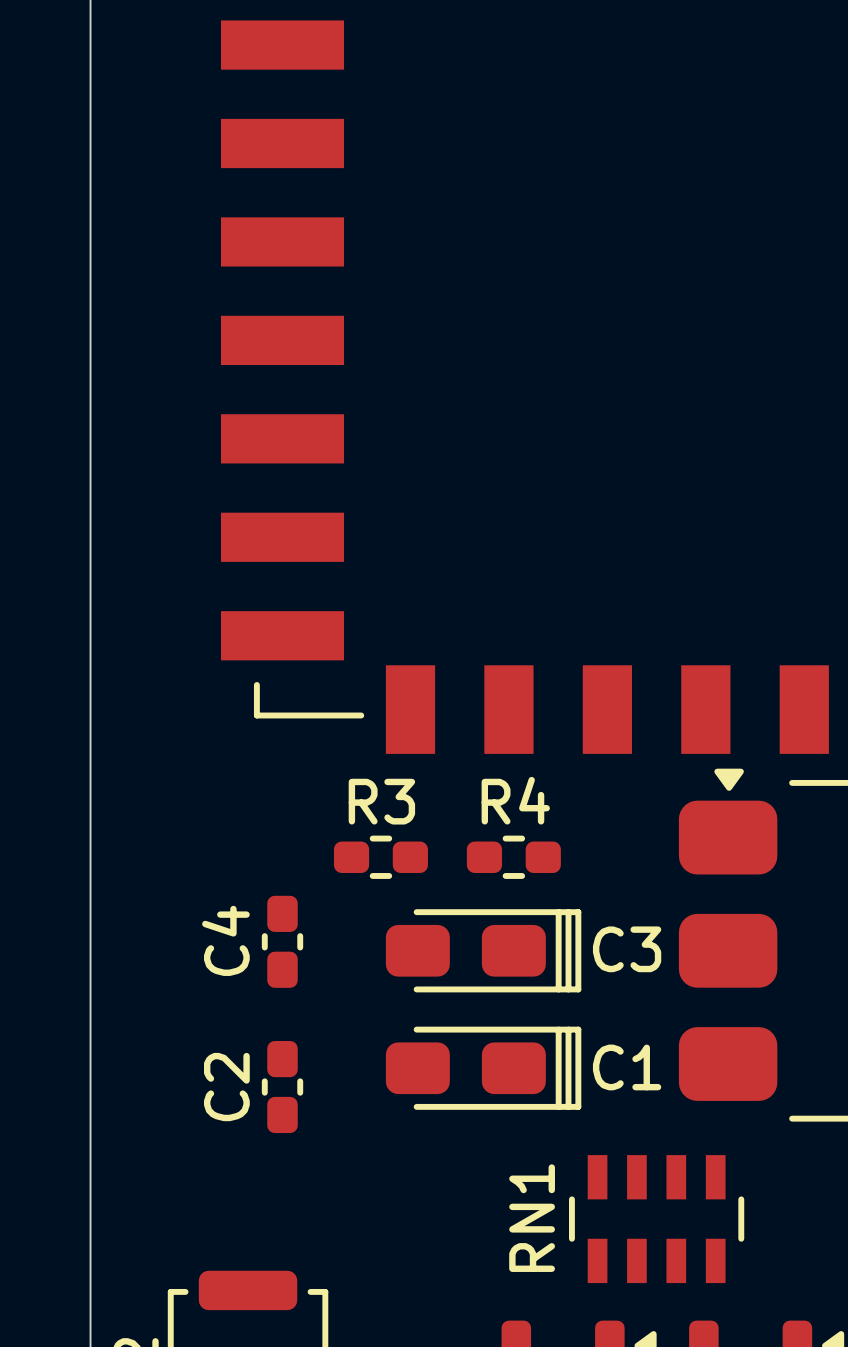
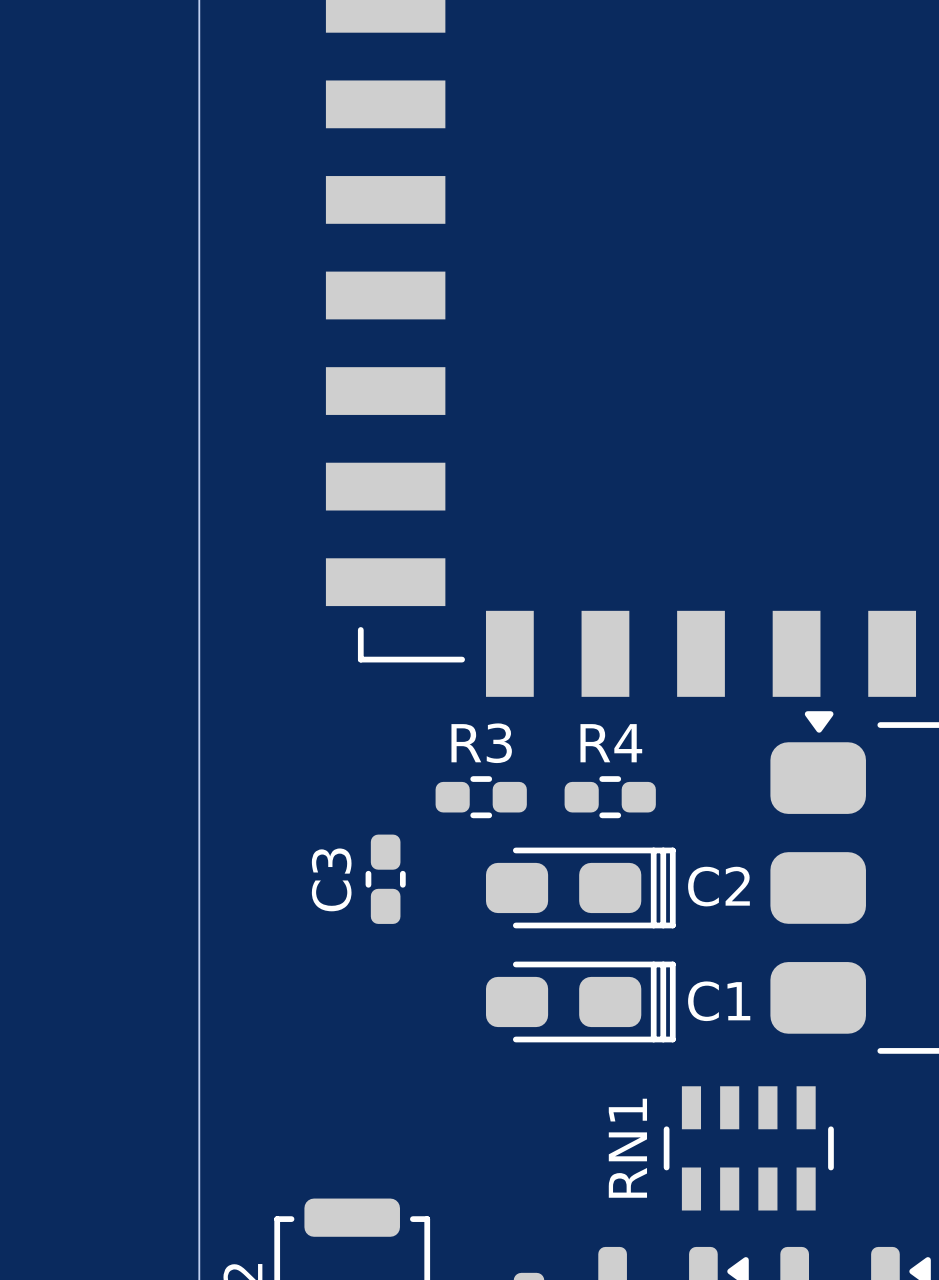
C4 name: C4 (225, 940) -> C3 (331, 879)
C3 name: C3 (627, 949) -> C2 (718, 886)
C2: (282, 1087) -> none

